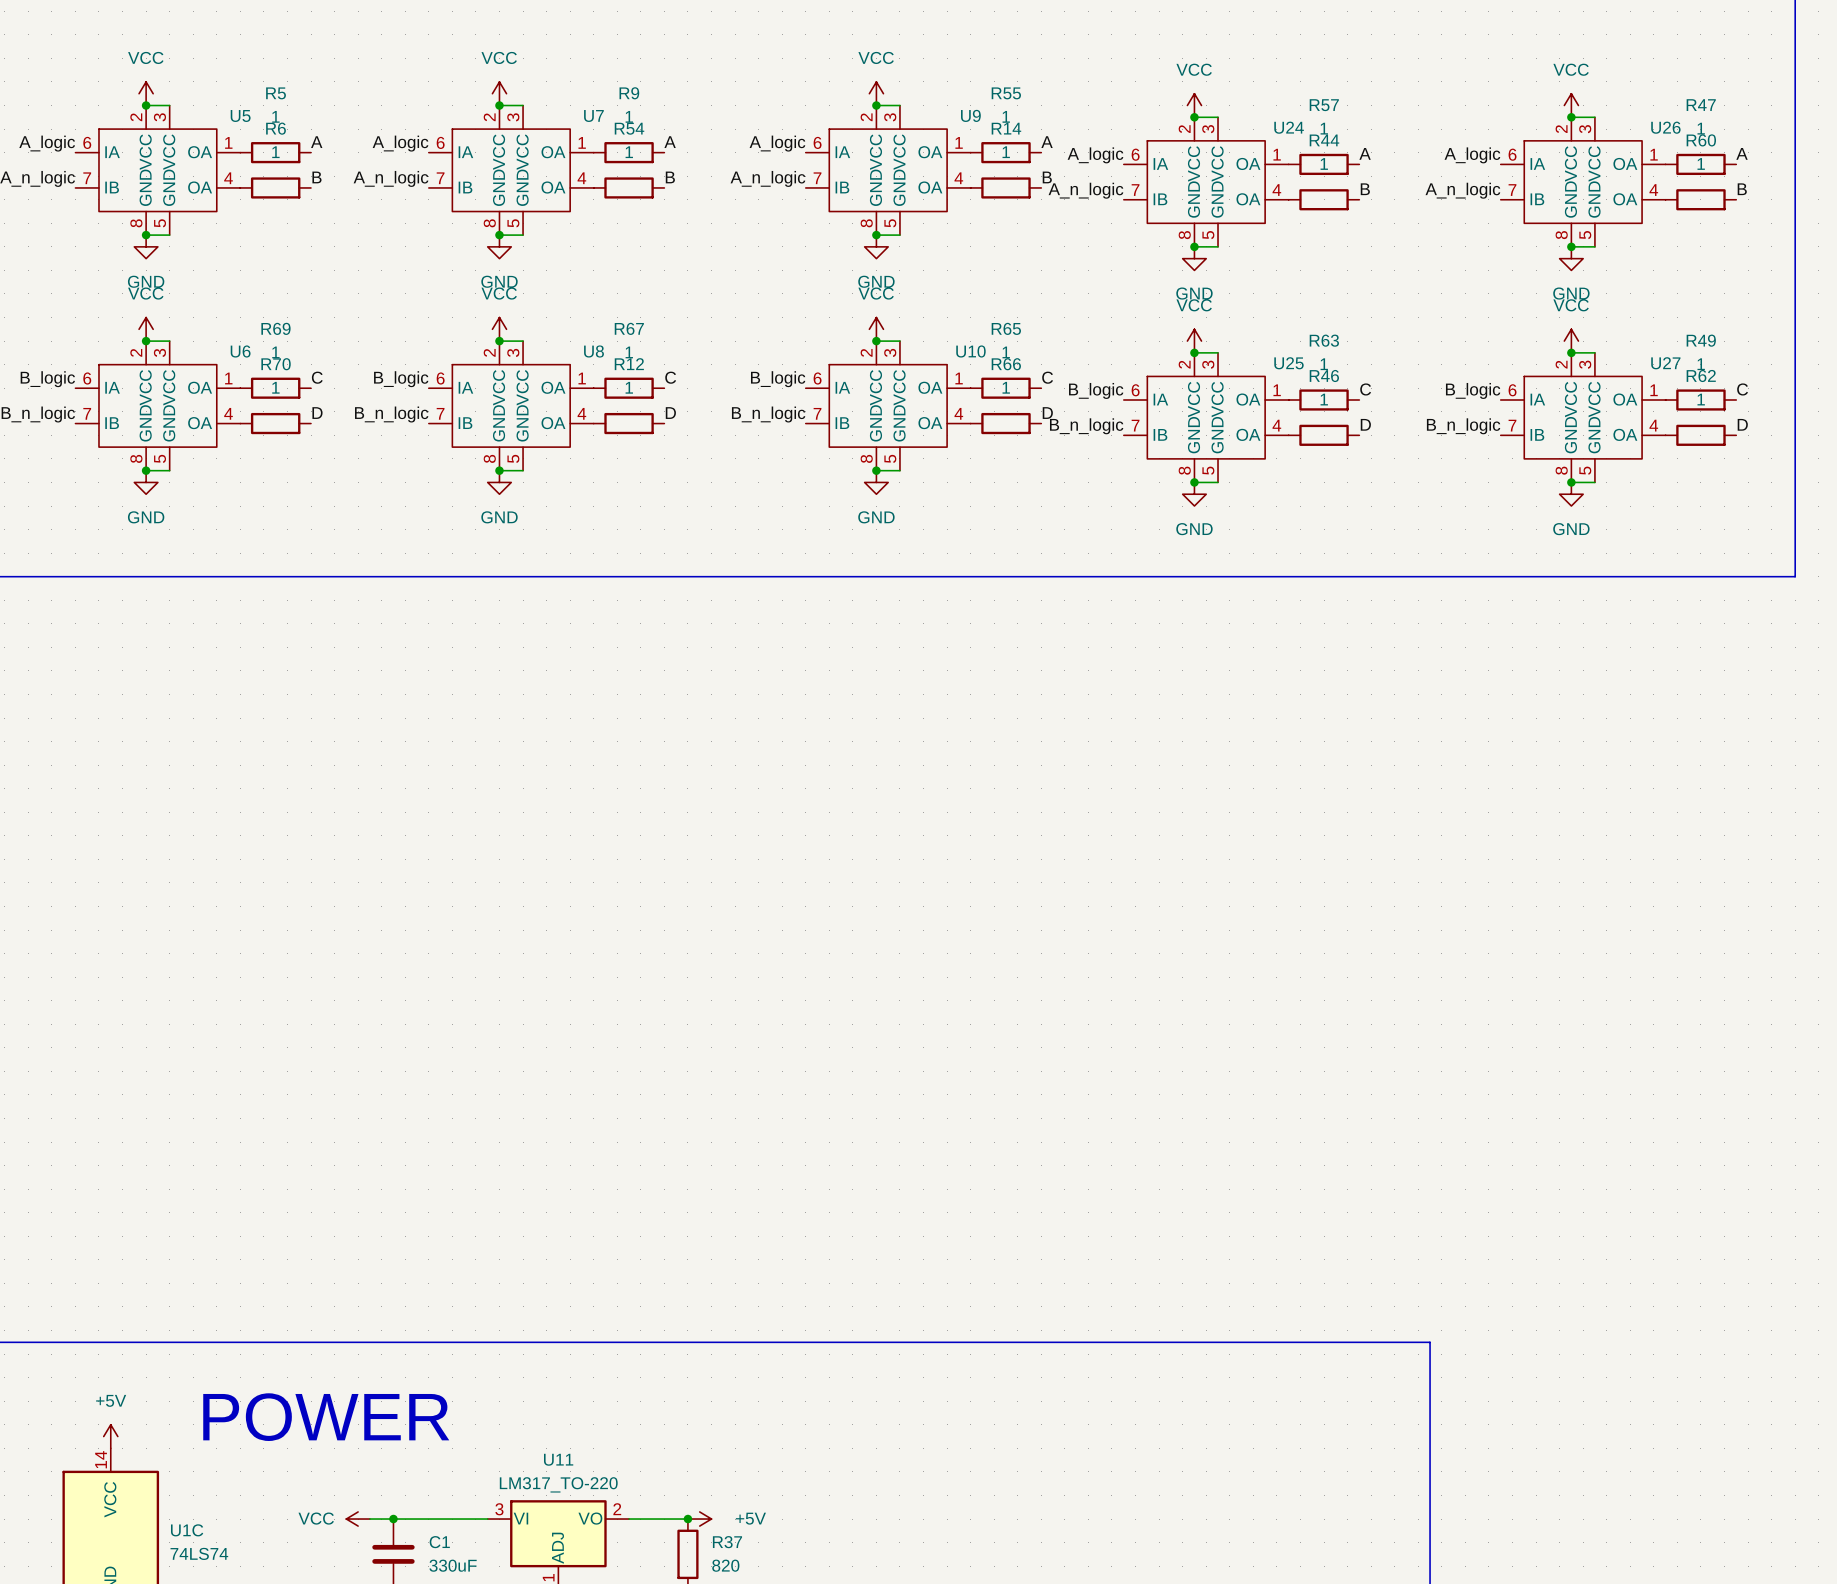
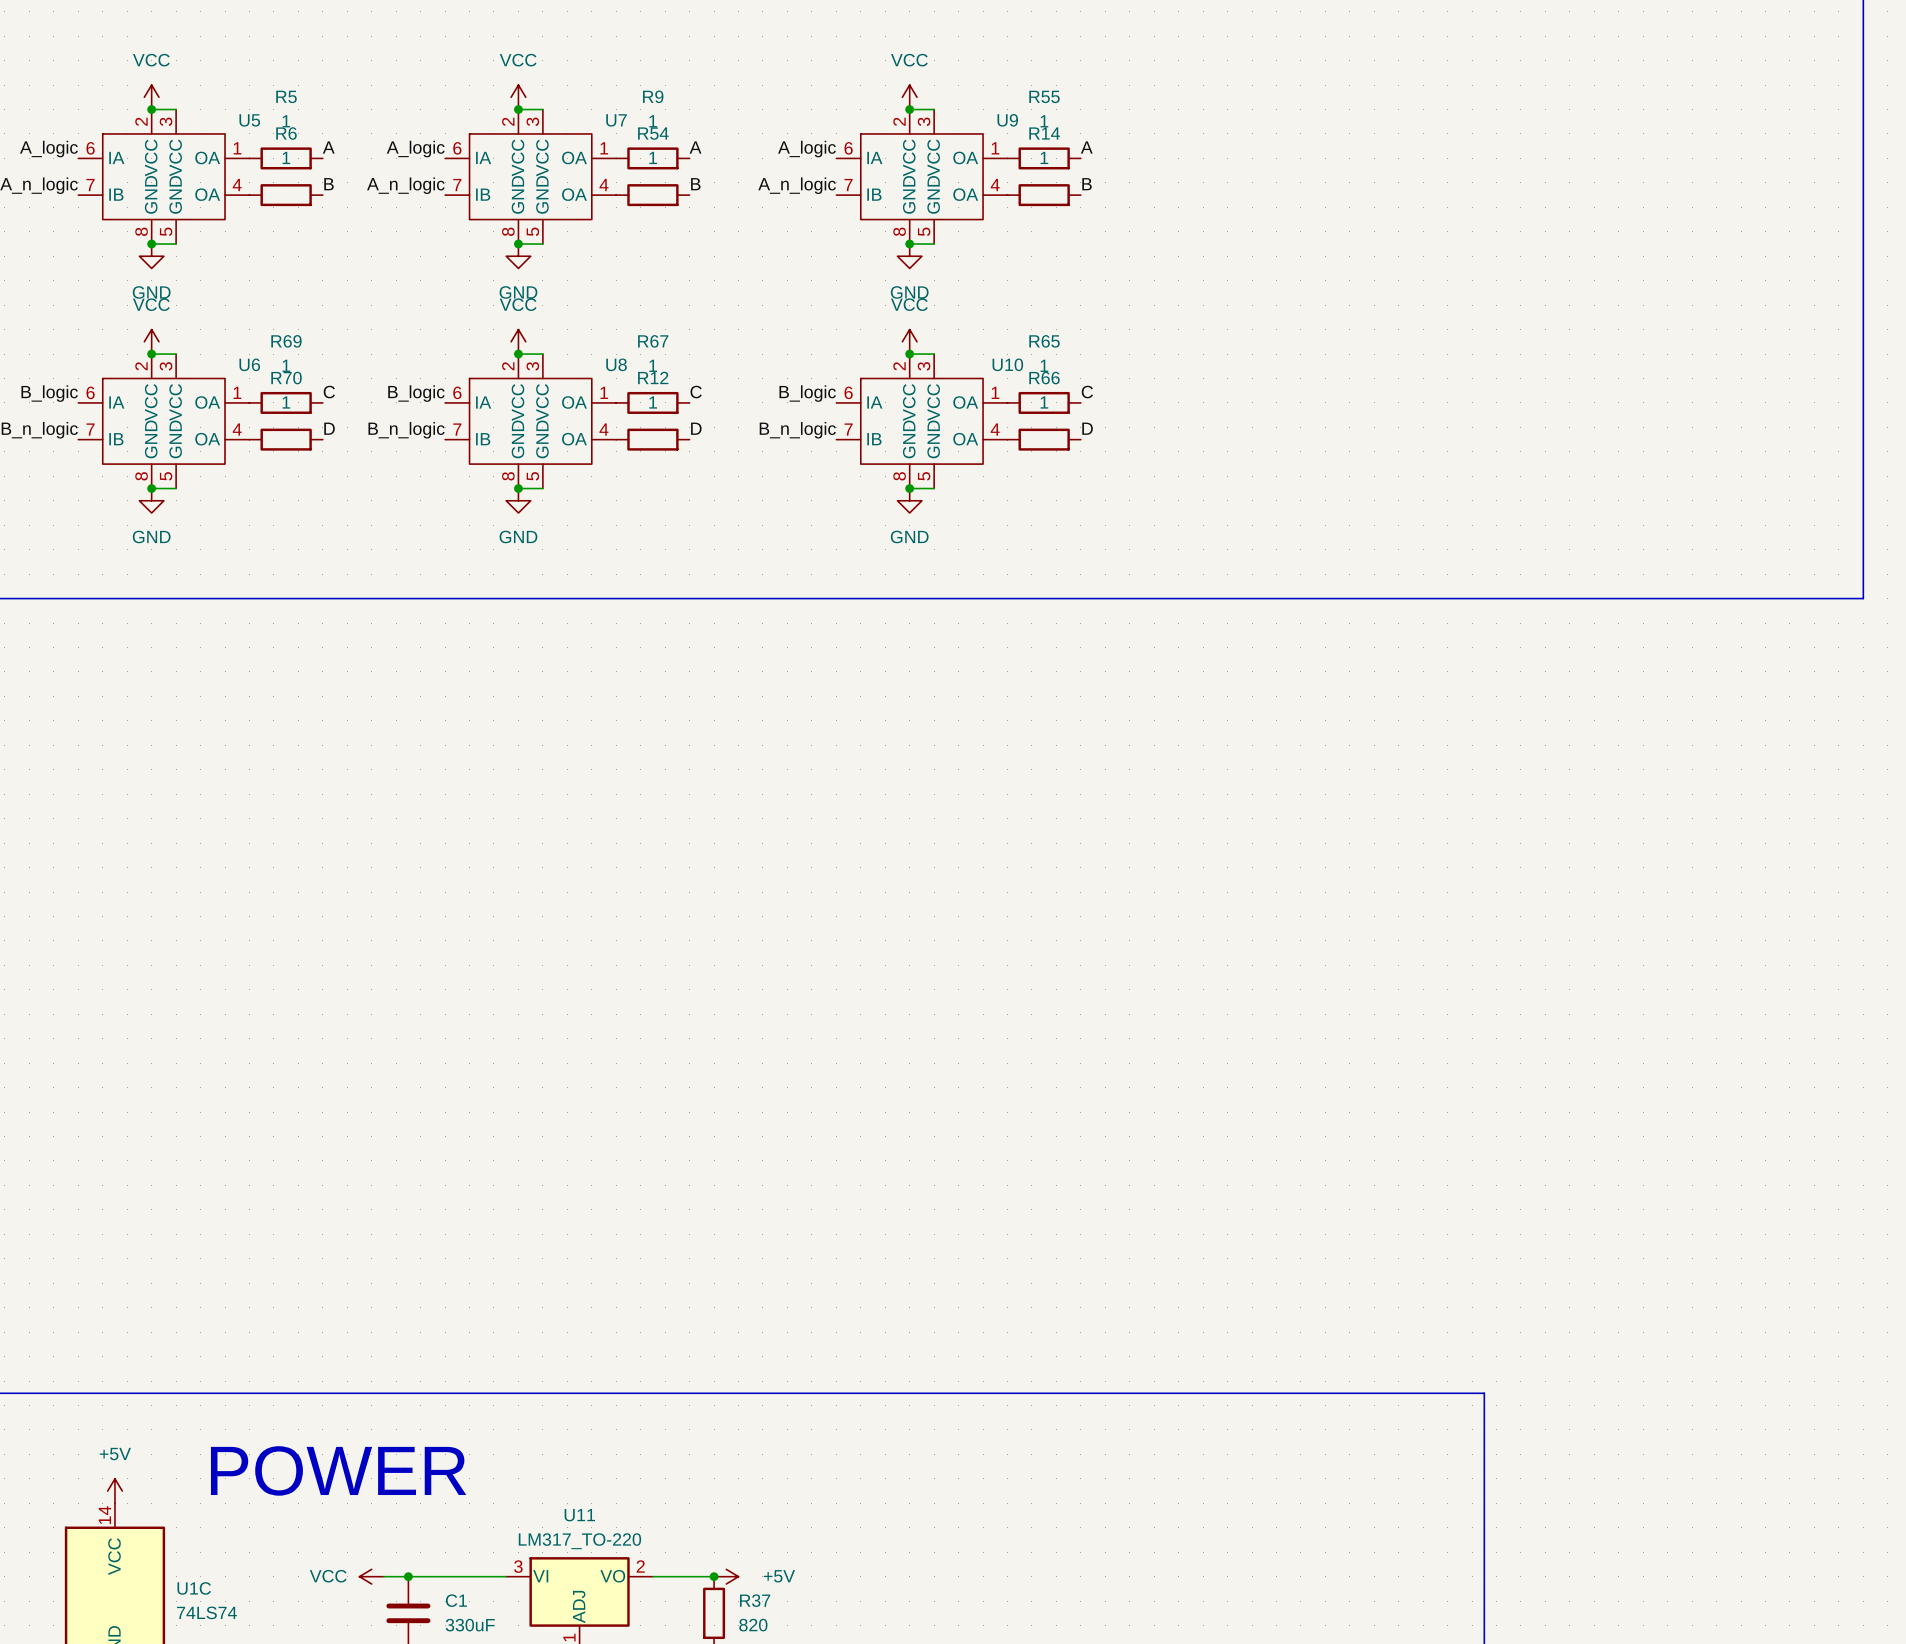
power symbol: VCC (1194, 105) -> none
power symbol: VCC (1571, 105) -> none
wire: (1194, 117) (1218, 117) -> none
junction: (1194, 117) -> none
wire: (1571, 117) (1594, 117) -> none
junction: (1571, 117) -> none
label: A (1365, 153) -> none
label: A (1742, 153) -> none
label: A_logic (1095, 155) -> none
label: A_logic (1472, 155) -> none
R57: 1 (1324, 164) -> none
R47: 1 (1700, 164) -> none
U24: (1206, 182) -> none
U26: (1583, 182) -> none
label: B (1365, 189) -> none
label: B (1742, 189) -> none
label: A_n_logic (1085, 190) -> none
label: A_n_logic (1462, 190) -> none
R44: 1 (1324, 199) -> none
R60: 1 (1700, 199) -> none
wire: (1194, 246) (1218, 246) -> none
junction: (1194, 246) -> none
wire: (1571, 246) (1594, 246) -> none
junction: (1571, 246) -> none
power symbol: GND (1194, 258) -> none
power symbol: GND (1571, 258) -> none
power symbol: VCC (1194, 341) -> none
power symbol: VCC (1571, 341) -> none
wire: (1194, 352) (1218, 352) -> none
junction: (1194, 352) -> none
wire: (1571, 352) (1594, 352) -> none
junction: (1571, 352) -> none
label: C (1365, 389) -> none
label: C (1742, 389) -> none
label: B_logic (1096, 390) -> none
label: B_logic (1473, 390) -> none
R63: 1 (1324, 399) -> none
R49: 1 (1700, 399) -> none
U25: (1206, 417) -> none
U27: (1583, 417) -> none
label: D (1365, 424) -> none
label: D (1742, 424) -> none
label: B_n_logic (1086, 426) -> none
label: B_n_logic (1463, 426) -> none
R46: 1 (1324, 435) -> none
R62: 1 (1700, 435) -> none
wire: (1194, 482) (1218, 482) -> none
junction: (1194, 482) -> none
wire: (1571, 482) (1594, 482) -> none
junction: (1571, 482) -> none
power symbol: GND (1194, 494) -> none
power symbol: GND (1571, 494) -> none

